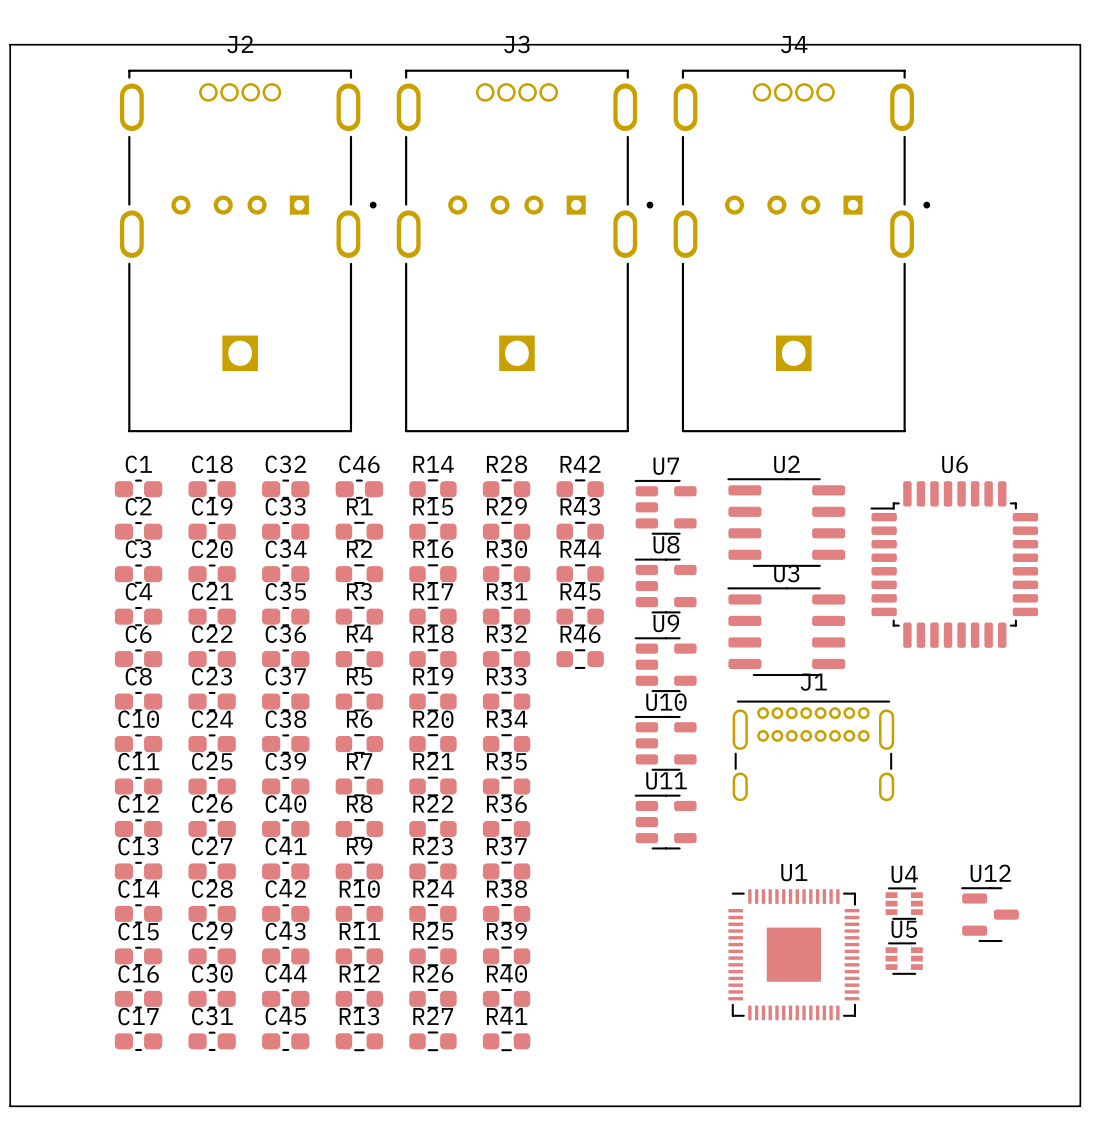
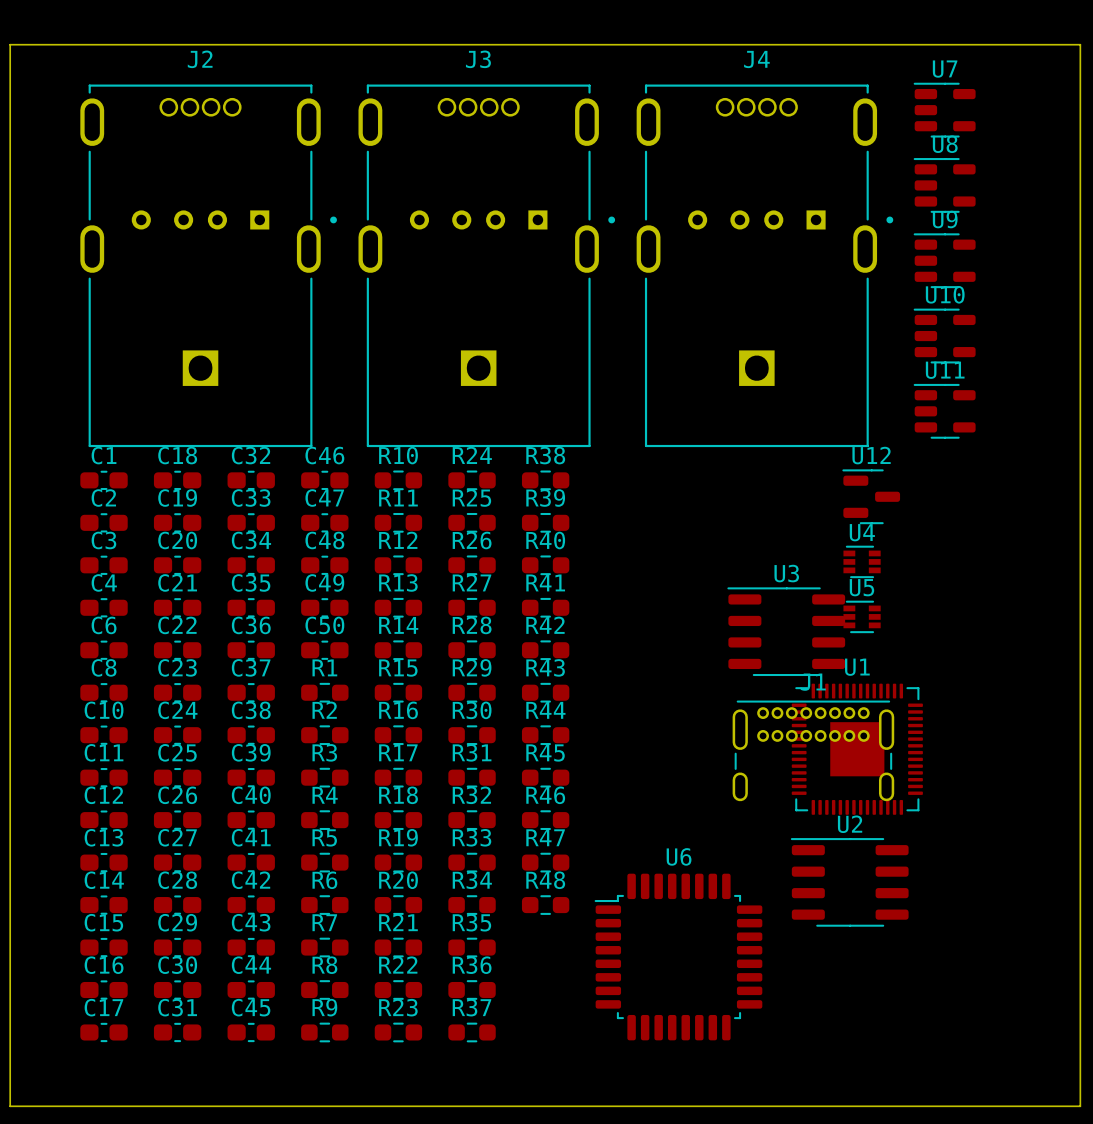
J2 position: (248, 250) -> (208, 265)
J3 position: (525, 250) -> (486, 265)
J4 position: (801, 250) -> (764, 265)
C1 position: (138, 489) -> (104, 480)
C18 position: (212, 489) -> (177, 480)
C32 position: (285, 489) -> (251, 480)
C46 position: (359, 489) -> (324, 480)
R14 position: (432, 489) -> (398, 650)
R28 position: (506, 489) -> (472, 650)
R42 position: (580, 489) -> (545, 650)
U7 position: (665, 507) -> (944, 110)
C47: none -> (324, 522)
U2 position: (786, 522) -> (849, 882)
C2 position: (138, 531) -> (104, 522)
C19 position: (212, 531) -> (177, 522)
C33 position: (285, 531) -> (251, 522)
R1 position: (359, 531) -> (324, 692)
R15 position: (432, 531) -> (398, 692)
R29 position: (506, 531) -> (472, 692)
R43 position: (580, 531) -> (545, 692)
U6 position: (954, 564) -> (678, 957)
C48: none -> (324, 565)
C3 position: (138, 574) -> (104, 565)
C20 position: (212, 574) -> (177, 565)
C34 position: (285, 574) -> (251, 565)
R2 position: (359, 574) -> (324, 735)
R16 position: (432, 574) -> (398, 735)
R30 position: (506, 574) -> (472, 735)
R44 position: (580, 574) -> (545, 735)
U8 position: (665, 586) -> (944, 185)
C49: none -> (324, 607)
C4 position: (138, 616) -> (104, 607)
C21 position: (212, 616) -> (177, 607)
C35 position: (285, 616) -> (251, 607)
R3 position: (359, 616) -> (324, 777)
R17 position: (432, 616) -> (398, 777)
R31 position: (506, 616) -> (472, 777)
R45 position: (580, 616) -> (545, 777)
C50: none -> (324, 650)
C6 position: (138, 659) -> (104, 650)
C22 position: (212, 659) -> (177, 650)
C36 position: (285, 659) -> (251, 650)
R4 position: (359, 659) -> (324, 820)
R18 position: (432, 659) -> (398, 820)
R32 position: (506, 659) -> (472, 820)
R46 position: (580, 659) -> (545, 820)
U9 position: (665, 664) -> (944, 260)
C8 position: (138, 701) -> (104, 692)
C23 position: (212, 701) -> (177, 692)
C37 position: (285, 701) -> (251, 692)
R5 position: (359, 701) -> (324, 862)
R19 position: (432, 701) -> (398, 862)
R33 position: (506, 701) -> (472, 862)
U10 position: (665, 743) -> (944, 336)
C10 position: (138, 744) -> (104, 735)
C24 position: (212, 744) -> (177, 735)
C38 position: (285, 744) -> (251, 735)
R6 position: (359, 744) -> (324, 905)
R20 position: (432, 744) -> (398, 905)
R34 position: (506, 744) -> (472, 905)
C11 position: (138, 786) -> (104, 777)
C25 position: (212, 786) -> (177, 777)
C39 position: (285, 786) -> (251, 777)
R7 position: (359, 786) -> (324, 947)
R21 position: (432, 786) -> (398, 947)
R35 position: (506, 786) -> (472, 947)
U11 position: (665, 822) -> (944, 411)
C12 position: (138, 828) -> (104, 820)
C26 position: (212, 828) -> (177, 820)
C40 position: (285, 828) -> (251, 820)
R8 position: (359, 828) -> (324, 990)
R22 position: (432, 828) -> (398, 990)
R36 position: (506, 828) -> (472, 990)
R47: none -> (545, 862)
C13 position: (138, 871) -> (104, 862)
C27 position: (212, 871) -> (177, 862)
C41 position: (285, 871) -> (251, 862)
R9 position: (359, 871) -> (324, 1032)
R23 position: (432, 871) -> (398, 1032)
R37 position: (506, 871) -> (472, 1032)
U4 position: (904, 903) -> (862, 561)
R48: none -> (545, 905)
C14 position: (138, 913) -> (104, 905)
C28 position: (212, 913) -> (177, 905)
C42 position: (285, 913) -> (251, 905)
R10 position: (359, 913) -> (398, 480)
R24 position: (432, 913) -> (472, 480)
R38 position: (506, 913) -> (545, 480)
U12 position: (989, 914) -> (871, 496)
U1 position: (793, 954) -> (857, 749)
C15 position: (138, 956) -> (104, 947)
C29 position: (212, 956) -> (177, 947)
C43 position: (285, 956) -> (251, 947)
R11 position: (359, 956) -> (398, 522)
R25 position: (432, 956) -> (472, 522)
R39 position: (506, 956) -> (545, 522)
U5 position: (904, 958) -> (862, 616)
C16 position: (138, 998) -> (104, 990)
C30 position: (212, 998) -> (177, 990)
C44 position: (285, 998) -> (251, 990)
R12 position: (359, 998) -> (398, 565)
R26 position: (432, 998) -> (472, 565)
R40 position: (506, 998) -> (545, 565)
C17 position: (138, 1041) -> (104, 1032)
C31 position: (212, 1041) -> (177, 1032)
C45 position: (285, 1041) -> (251, 1032)
R13 position: (359, 1041) -> (398, 607)
R27 position: (432, 1041) -> (472, 607)
R41 position: (506, 1041) -> (545, 607)

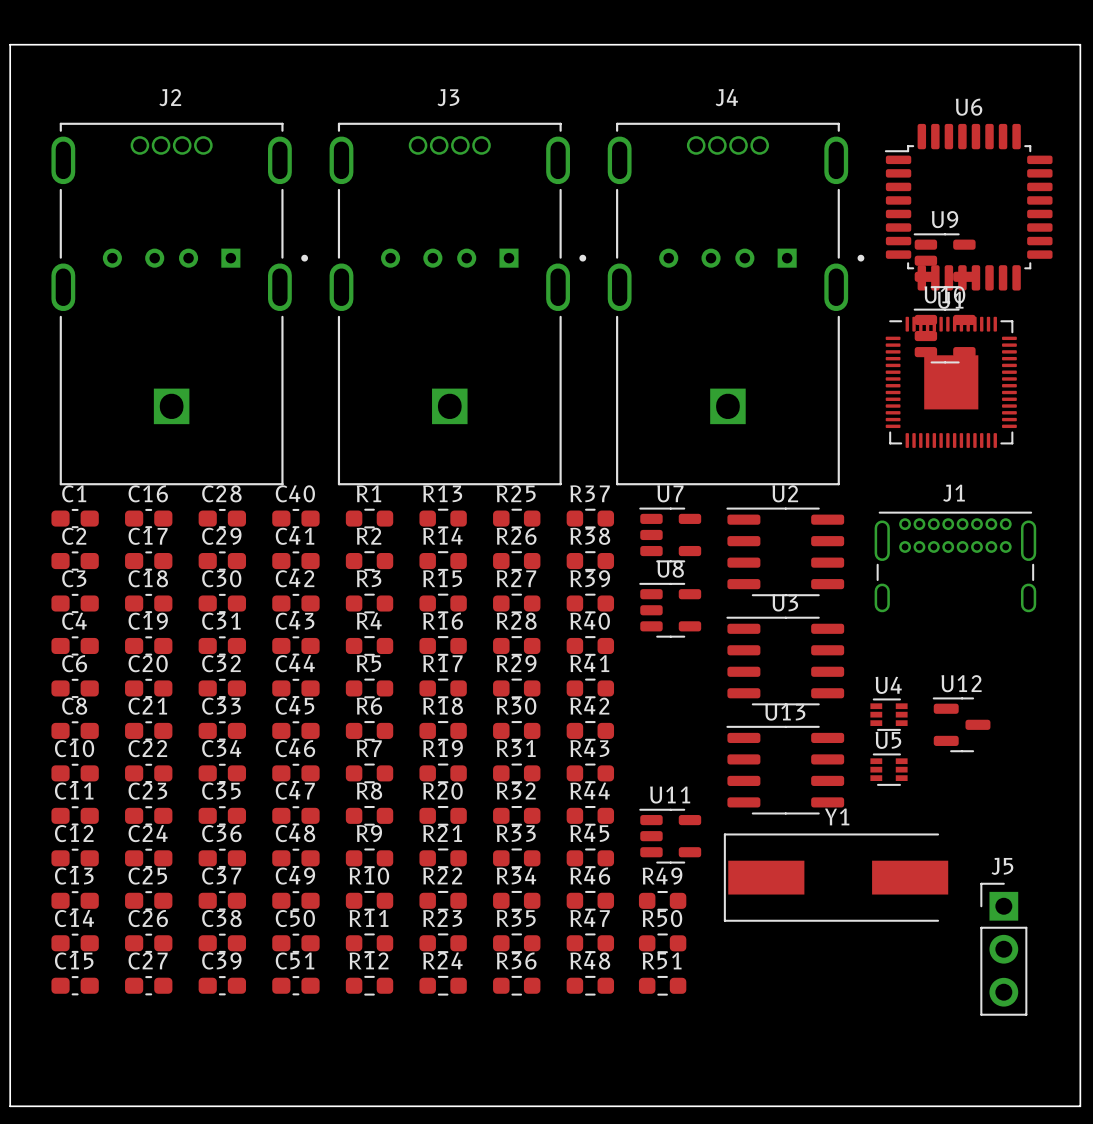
U7 position: (944, 110) -> (670, 534)
U8 position: (944, 185) -> (670, 610)
J2 position: (208, 265) -> (179, 304)
J3 position: (486, 265) -> (457, 304)
J4 position: (764, 265) -> (736, 304)
U11 position: (944, 411) -> (670, 836)
C1 position: (104, 480) -> (75, 518)
C18 position: (177, 480) -> (148, 603)
C32 position: (251, 480) -> (222, 688)
C46 position: (324, 480) -> (295, 773)
R10 position: (398, 480) -> (369, 900)
R24 position: (472, 480) -> (443, 985)
R38 position: (545, 480) -> (590, 561)
U12 position: (871, 496) -> (961, 724)
C2 position: (104, 522) -> (75, 561)
C19 position: (177, 522) -> (148, 645)
C33 position: (251, 522) -> (222, 730)
C47 position: (324, 522) -> (295, 815)
R11 position: (398, 522) -> (369, 943)
R25 position: (472, 522) -> (516, 518)
R39 position: (545, 522) -> (590, 603)
U4 position: (862, 561) -> (888, 714)
C3 position: (104, 565) -> (75, 603)
C20 position: (177, 565) -> (148, 688)
C34 position: (251, 565) -> (222, 773)
C48 position: (324, 565) -> (295, 858)
R12 position: (398, 565) -> (369, 985)
R26 position: (472, 565) -> (516, 561)
R40 position: (545, 565) -> (590, 645)
C4 position: (104, 607) -> (75, 645)
C21 position: (177, 607) -> (148, 730)
C35 position: (251, 607) -> (222, 815)
C49 position: (324, 607) -> (295, 900)
R13 position: (398, 607) -> (443, 518)
R27 position: (472, 607) -> (516, 603)
R41 position: (545, 607) -> (590, 688)
U5 position: (862, 616) -> (888, 769)
U3 position: (786, 631) -> (785, 661)
C6 position: (104, 650) -> (75, 688)
C22 position: (177, 650) -> (148, 773)
C36 position: (251, 650) -> (222, 858)
C50 position: (324, 650) -> (295, 943)
R14 position: (398, 650) -> (443, 561)
R28 position: (472, 650) -> (516, 645)
R42 position: (545, 650) -> (590, 730)
C8 position: (104, 692) -> (75, 730)
C23 position: (177, 692) -> (148, 815)
C37 position: (251, 692) -> (222, 900)
R1 position: (324, 692) -> (369, 518)
R15 position: (398, 692) -> (443, 603)
R29 position: (472, 692) -> (516, 688)
R43 position: (545, 692) -> (590, 773)
C10 position: (104, 735) -> (75, 773)
C24 position: (177, 735) -> (148, 858)
C38 position: (251, 735) -> (222, 943)
R2 position: (324, 735) -> (369, 561)
R16 position: (398, 735) -> (443, 645)
R30 position: (472, 735) -> (516, 730)
R44 position: (545, 735) -> (590, 815)
U1 position: (857, 749) -> (951, 382)
J1 position: (813, 750) -> (955, 561)
U13: none -> (785, 770)
C11 position: (104, 777) -> (75, 815)
C25 position: (177, 777) -> (148, 900)
C39 position: (251, 777) -> (222, 985)
R3 position: (324, 777) -> (369, 603)
R17 position: (398, 777) -> (443, 688)
R31 position: (472, 777) -> (516, 773)
R45 position: (545, 777) -> (590, 858)
C12 position: (104, 820) -> (75, 858)
C26 position: (177, 820) -> (148, 943)
C40 position: (251, 820) -> (295, 518)
R4 position: (324, 820) -> (369, 645)
R18 position: (398, 820) -> (443, 730)
R32 position: (472, 820) -> (516, 815)
R46 position: (545, 820) -> (590, 900)
C13 position: (104, 862) -> (75, 900)
C27 position: (177, 862) -> (148, 985)
C41 position: (251, 862) -> (295, 561)
R5 position: (324, 862) -> (369, 688)
R19 position: (398, 862) -> (443, 773)
R33 position: (472, 862) -> (516, 858)
R47 position: (545, 862) -> (590, 943)
Y1: none -> (836, 877)
U2 position: (849, 882) -> (785, 551)
R49: none -> (662, 900)
C14 position: (104, 905) -> (75, 943)
C28 position: (177, 905) -> (222, 518)
C42 position: (251, 905) -> (295, 603)
R6 position: (324, 905) -> (369, 730)
R20 position: (398, 905) -> (443, 815)
R34 position: (472, 905) -> (516, 900)
R48 position: (545, 905) -> (590, 985)
R50: none -> (662, 943)
C15 position: (104, 947) -> (75, 985)
C29 position: (177, 947) -> (222, 561)
C43 position: (251, 947) -> (295, 645)
R7 position: (324, 947) -> (369, 773)
R21 position: (398, 947) -> (443, 858)
R35 position: (472, 947) -> (516, 943)
J5: none -> (1003, 949)
U6 position: (678, 957) -> (968, 207)
C51: none -> (295, 985)
R51: none -> (662, 985)
C16 position: (104, 990) -> (148, 518)
C30 position: (177, 990) -> (222, 603)
C44 position: (251, 990) -> (295, 688)
R8 position: (324, 990) -> (369, 815)
R22 position: (398, 990) -> (443, 900)
R36 position: (472, 990) -> (516, 985)
C17 position: (104, 1032) -> (148, 561)
C31 position: (177, 1032) -> (222, 645)
C45 position: (251, 1032) -> (295, 730)
R9 position: (324, 1032) -> (369, 858)
R23 position: (398, 1032) -> (443, 943)
R37 position: (472, 1032) -> (590, 518)

